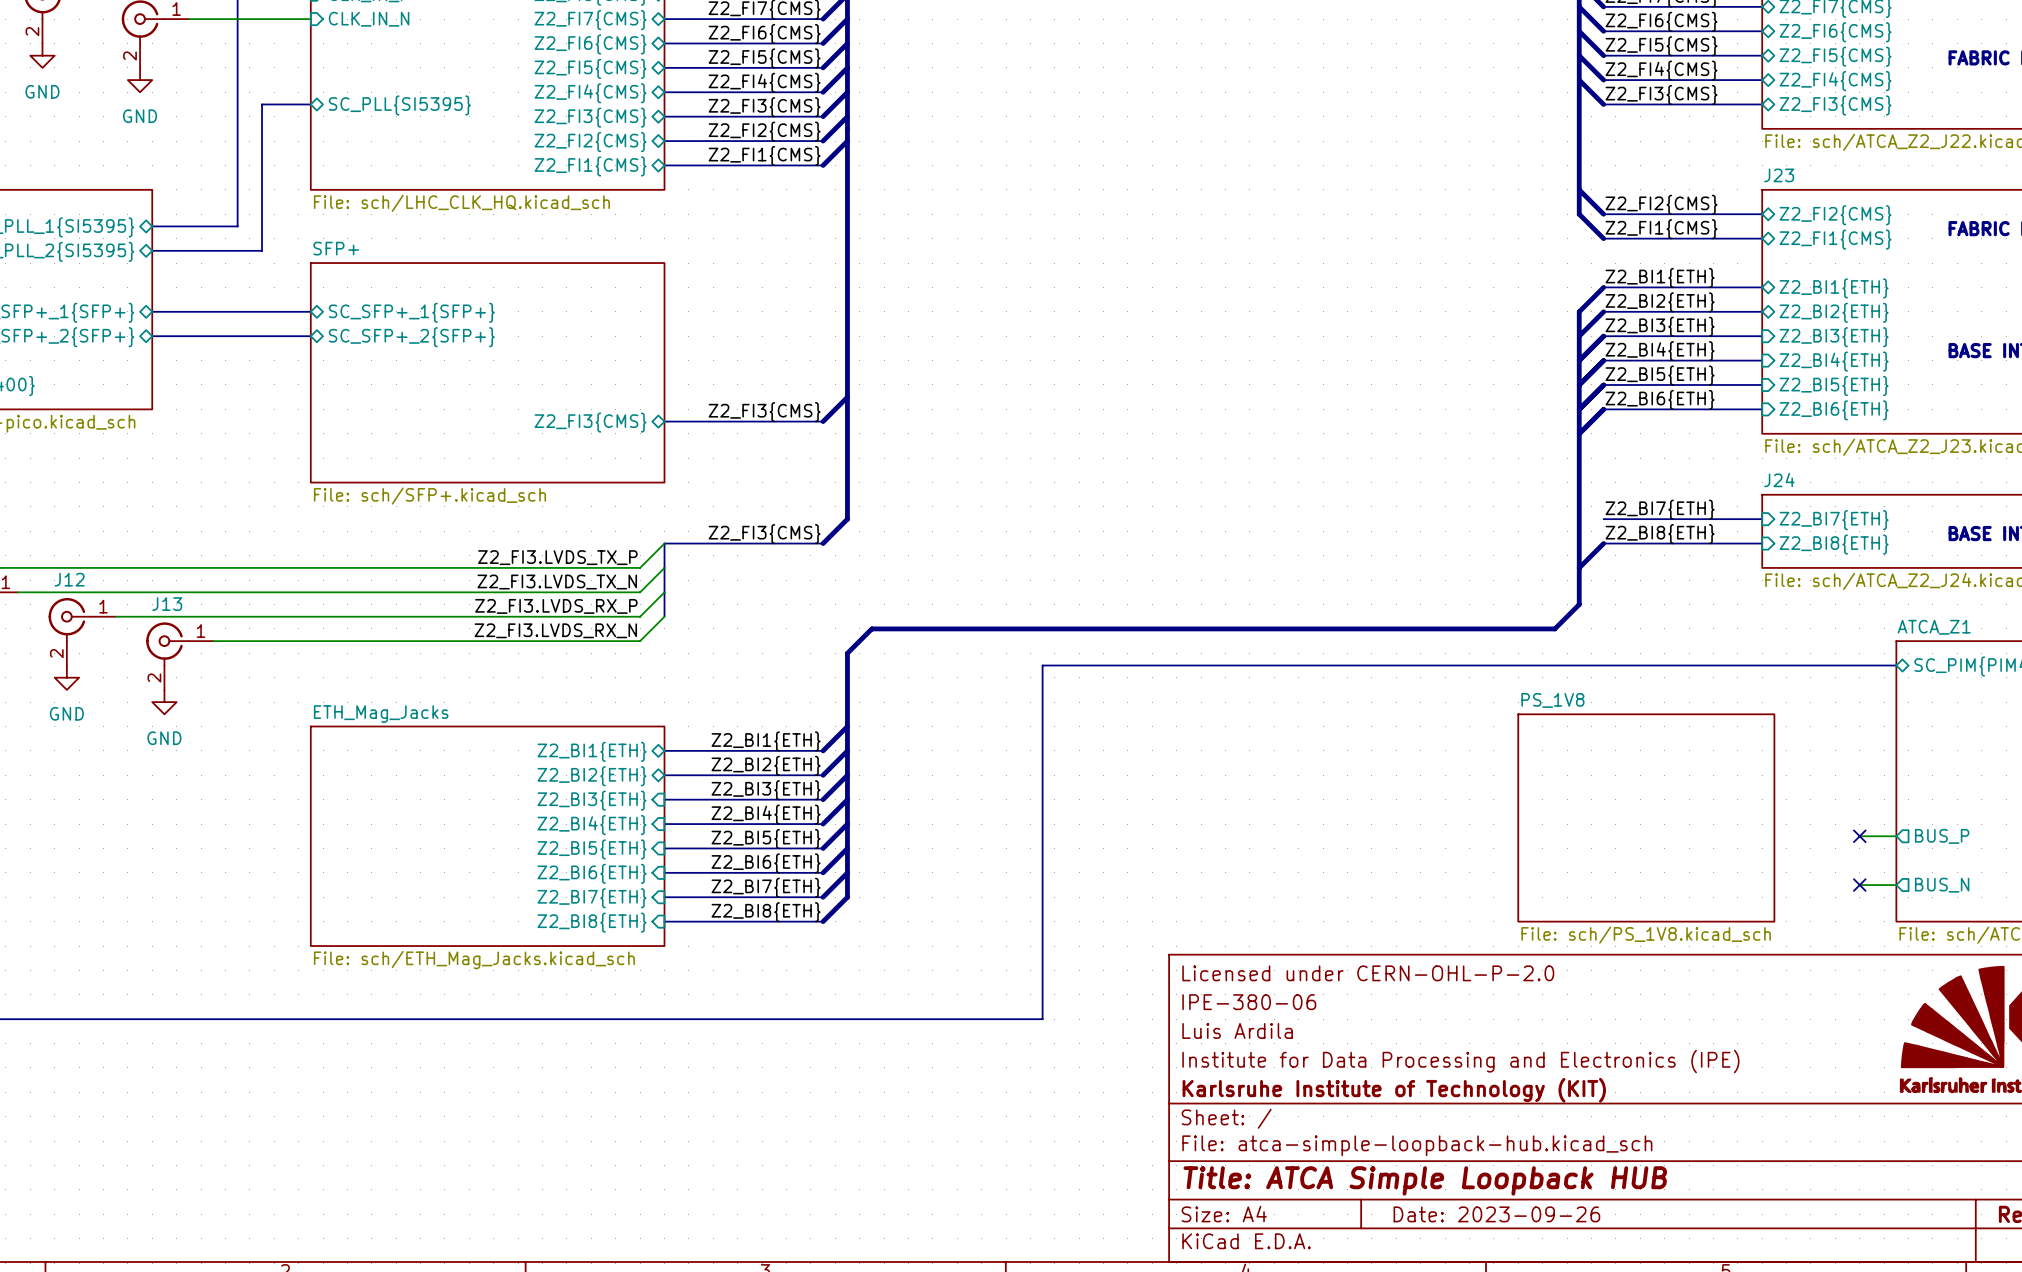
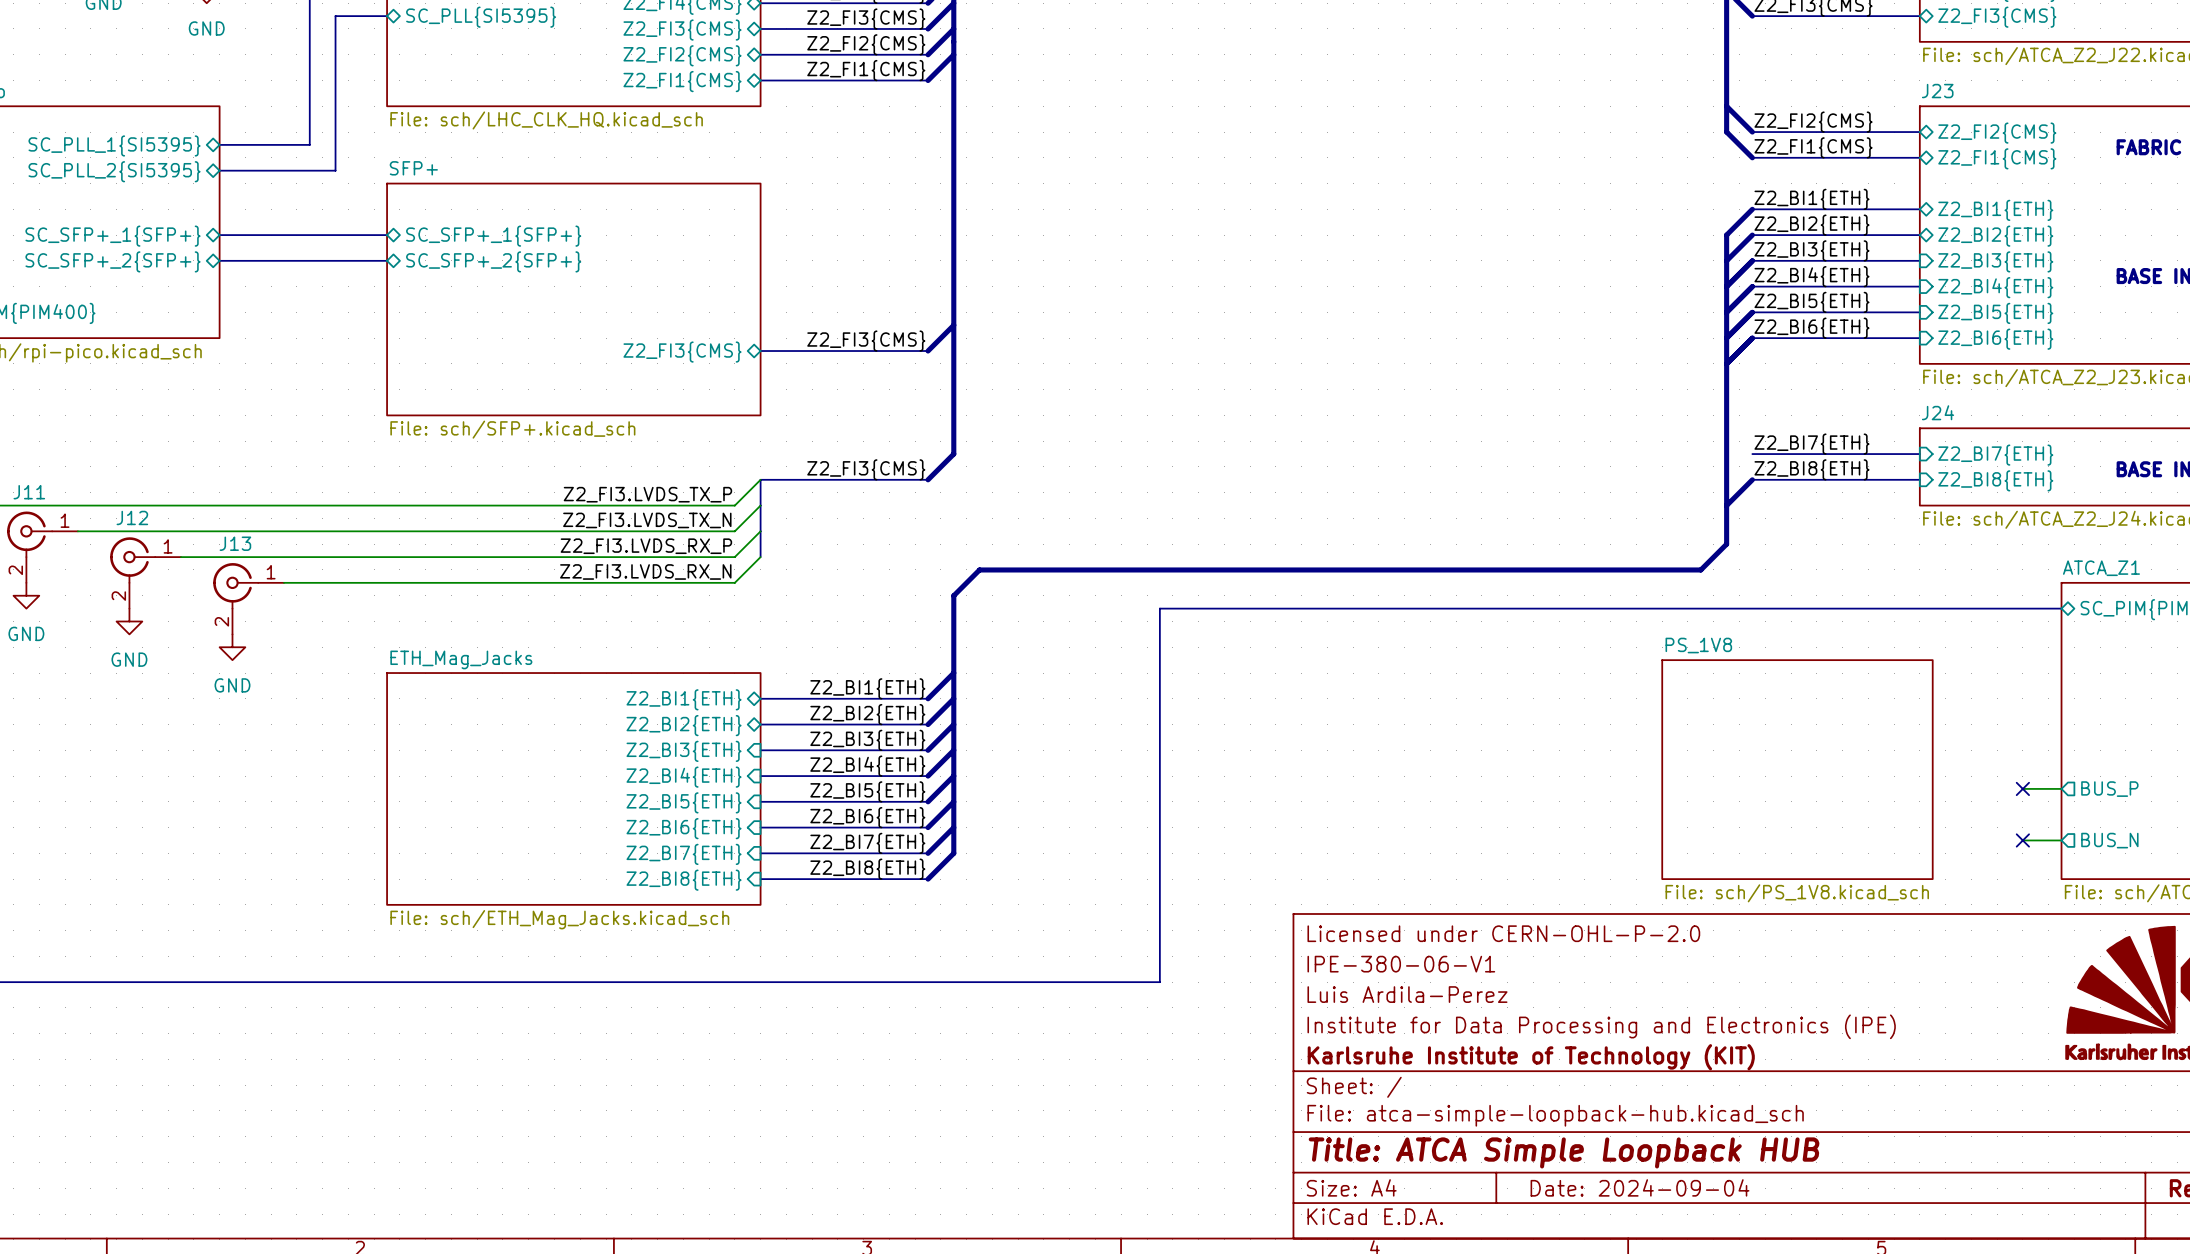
title block: IPE-380-06 (1249, 1002) -> IPE-380-06-V1 (1401, 964)
title block: Luis Ardila (1237, 1030) -> Luis Ardila-Perez (1407, 994)
title block: Date: 2023-09-26 (1496, 1214) -> Date: 2024-09-04 (1640, 1187)

